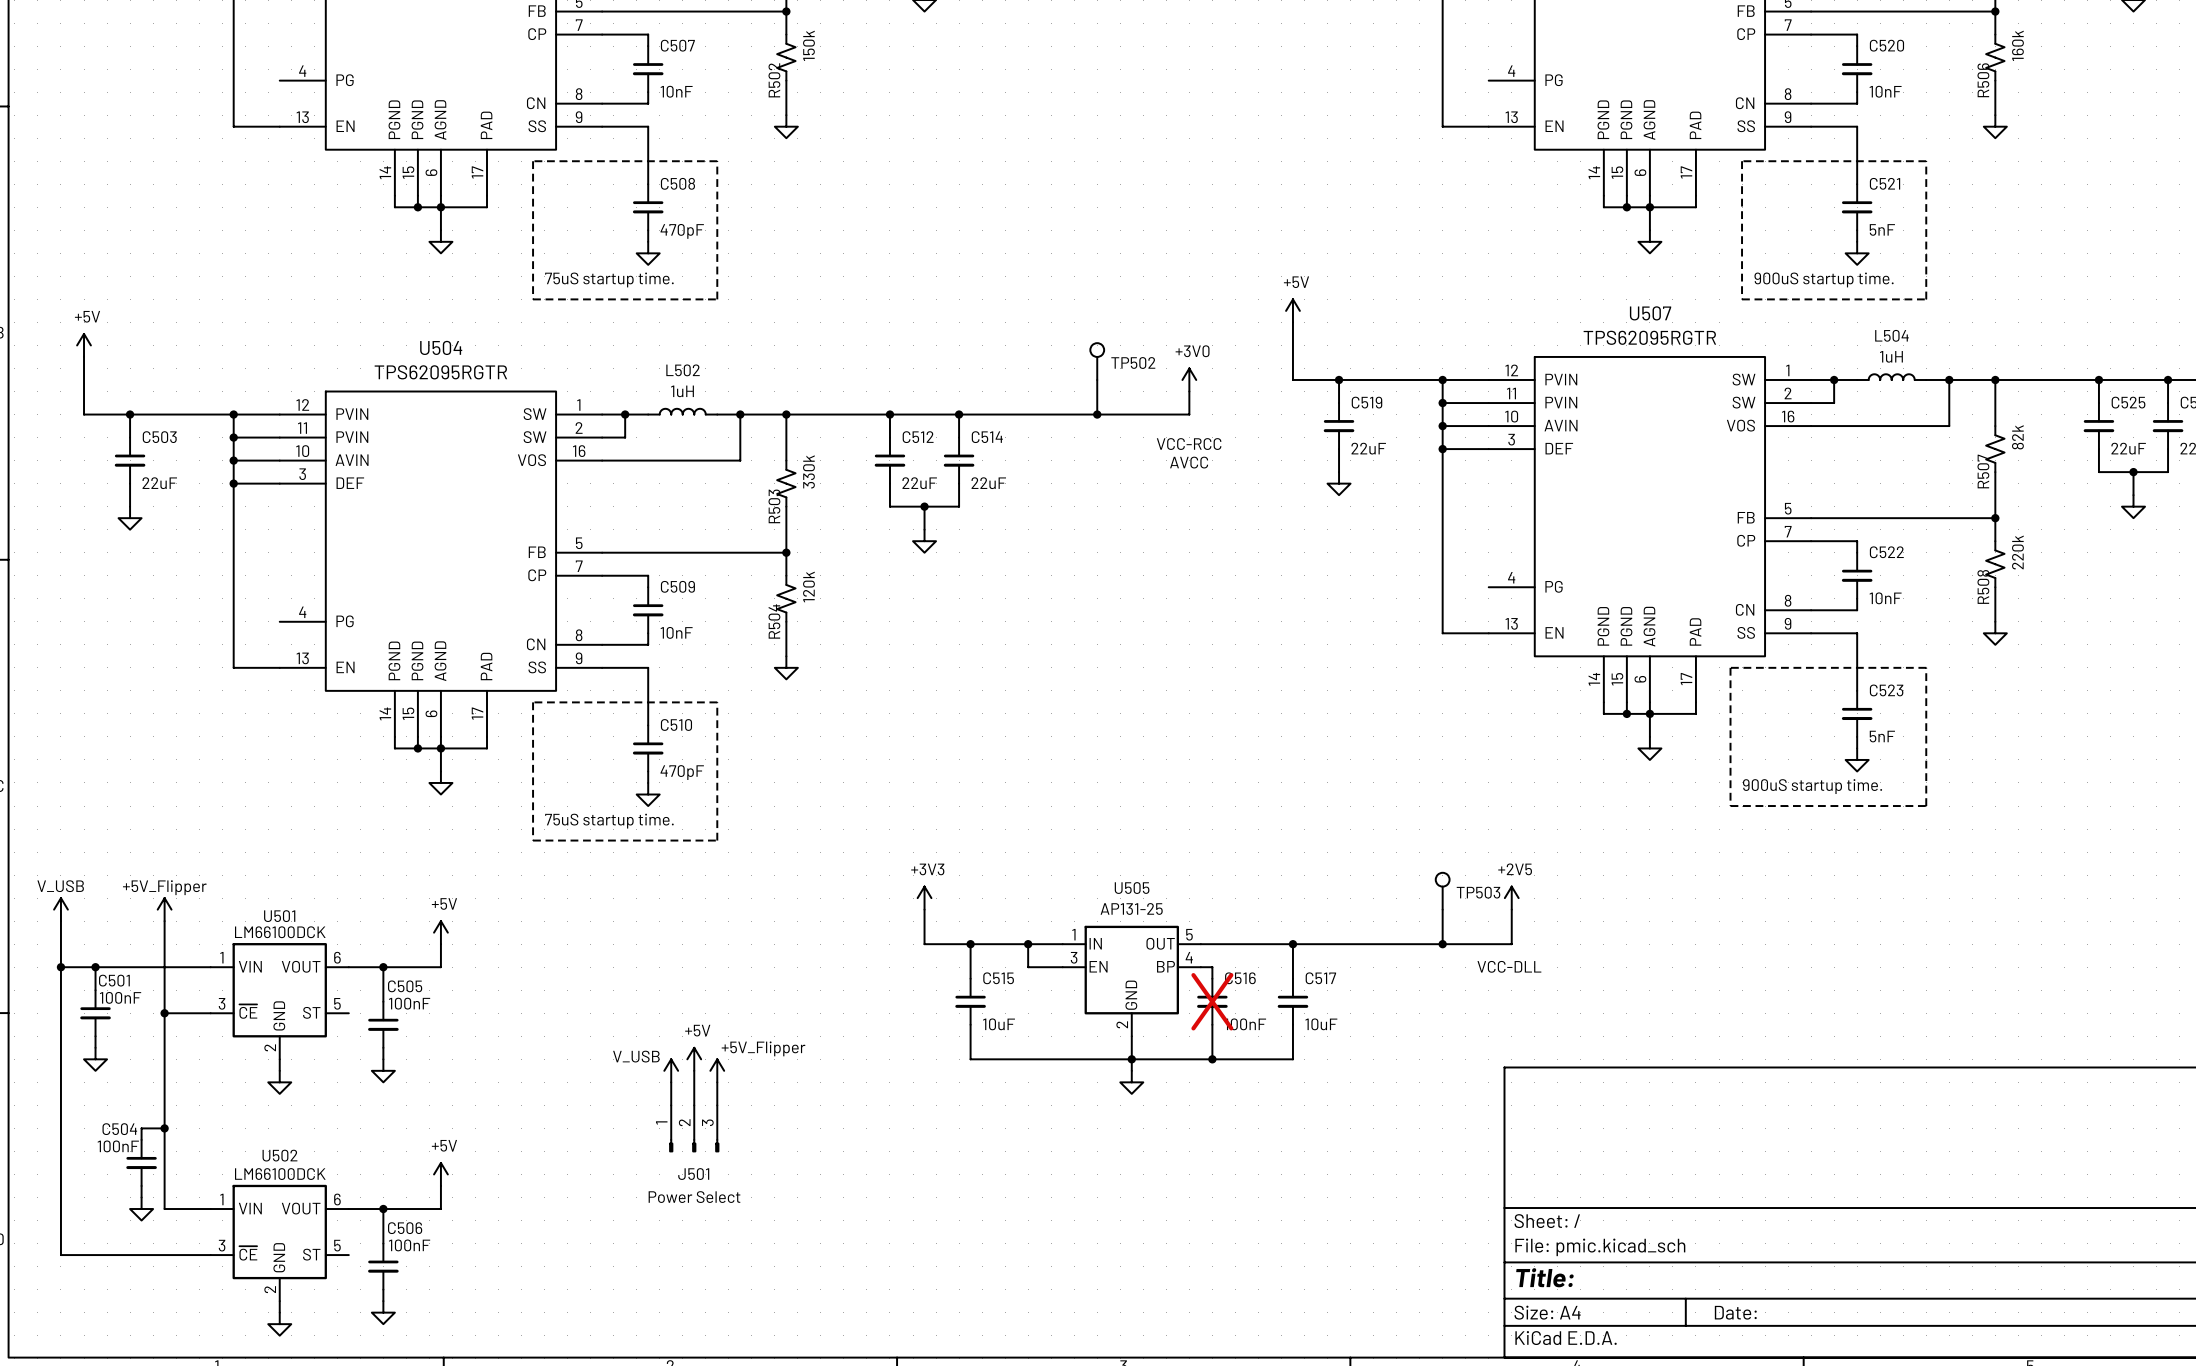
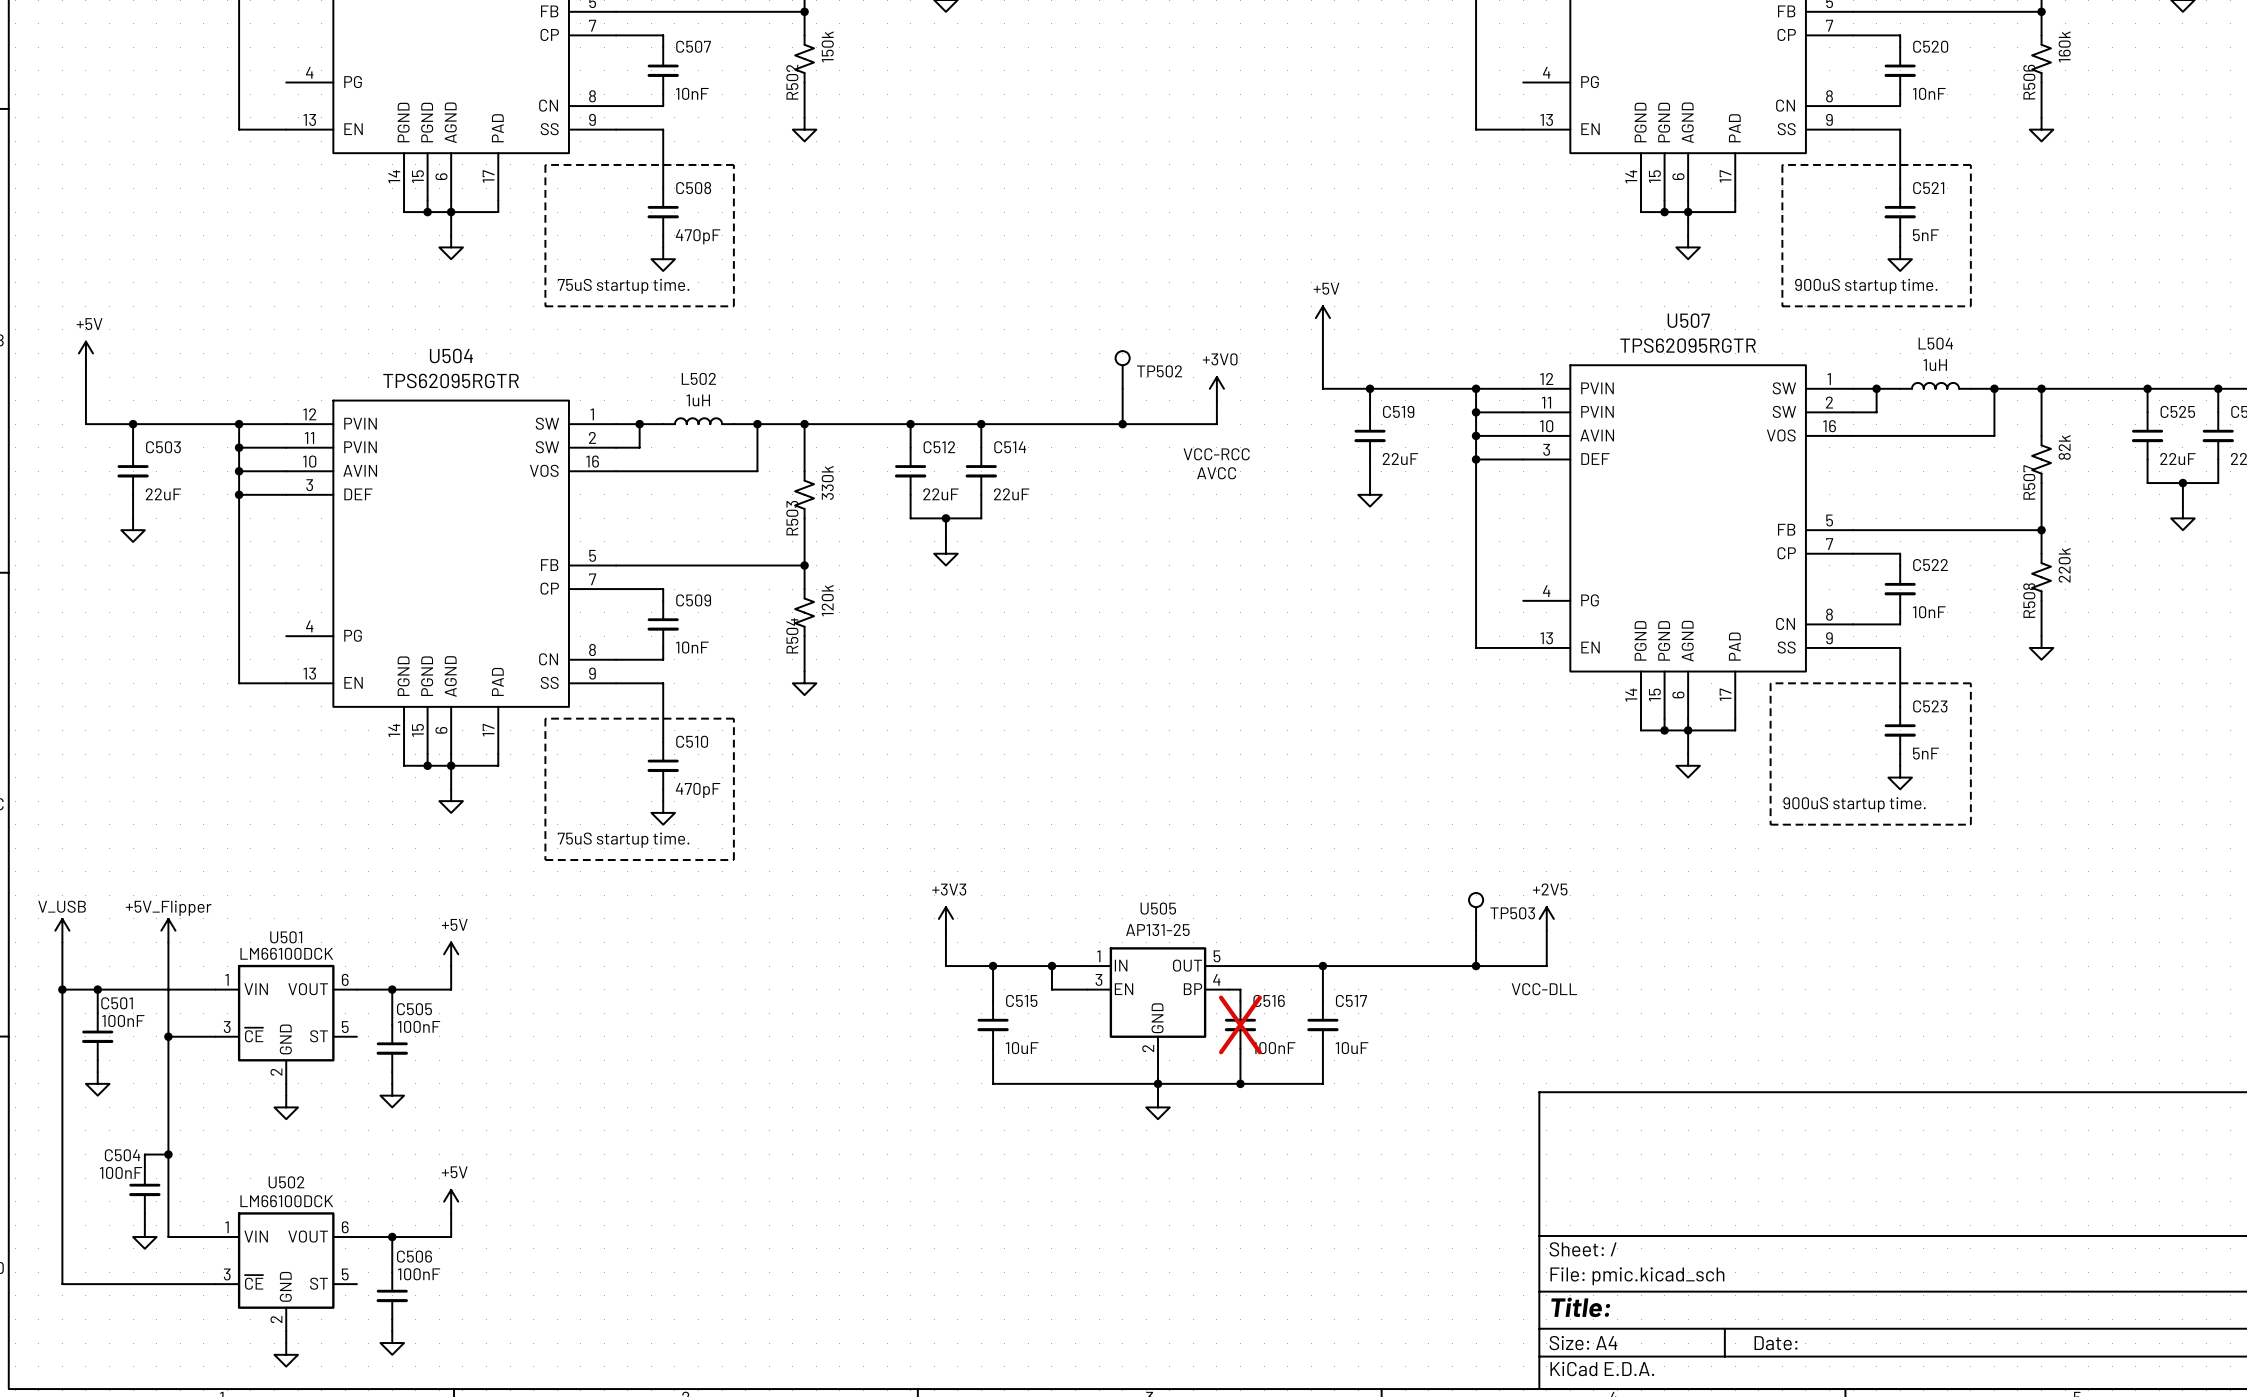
power symbol: +5V (694, 1059) -> none
power symbol: V_USB (671, 1070) -> none
wire: (694, 1070) (694, 1105) -> none
power symbol: +5V_Flipper (717, 1070) -> none
wire: (671, 1082) (671, 1105) -> none
wire: (717, 1082) (717, 1105) -> none
J501: Power Select (694, 1128) -> none

